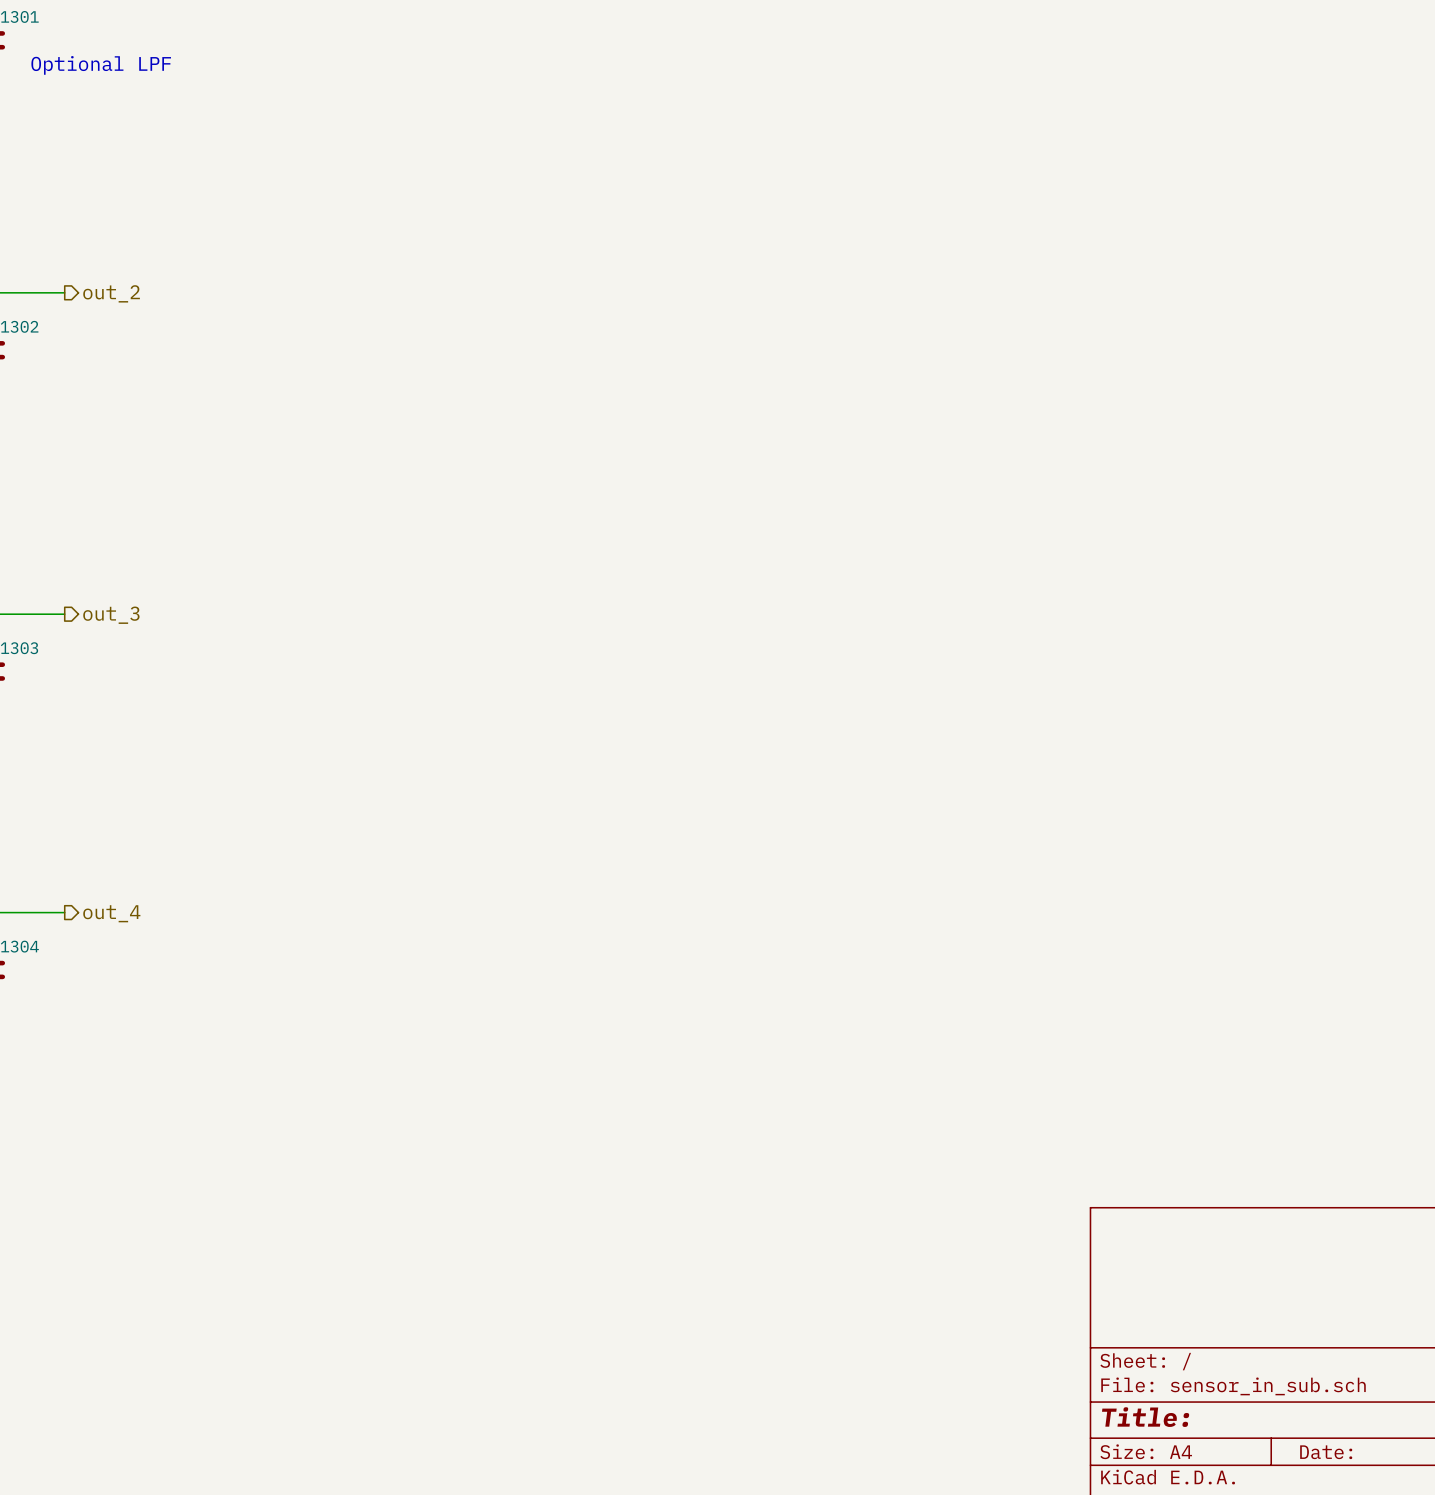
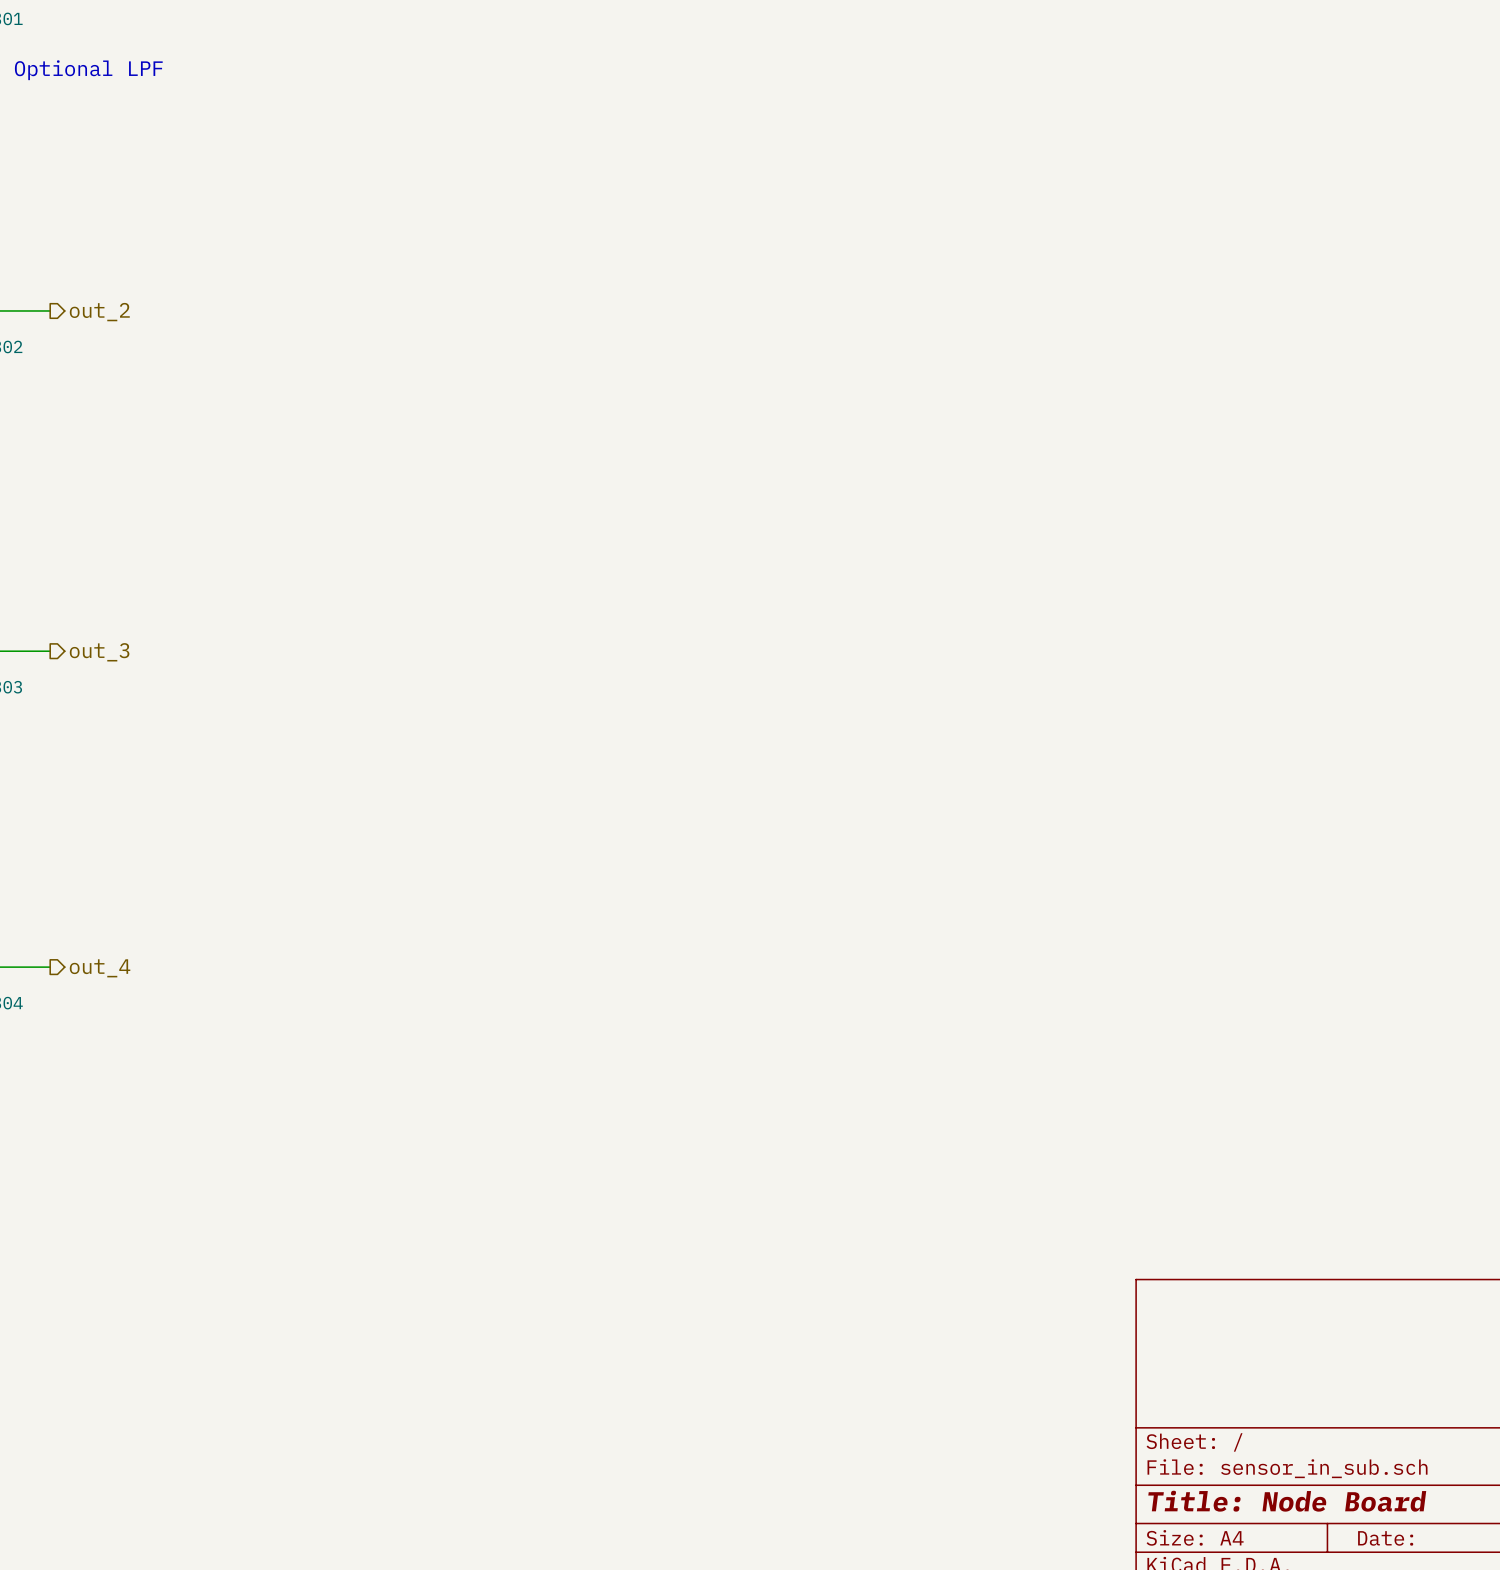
title block: Title: (1145, 1417) -> Title: Node Board (1287, 1501)

